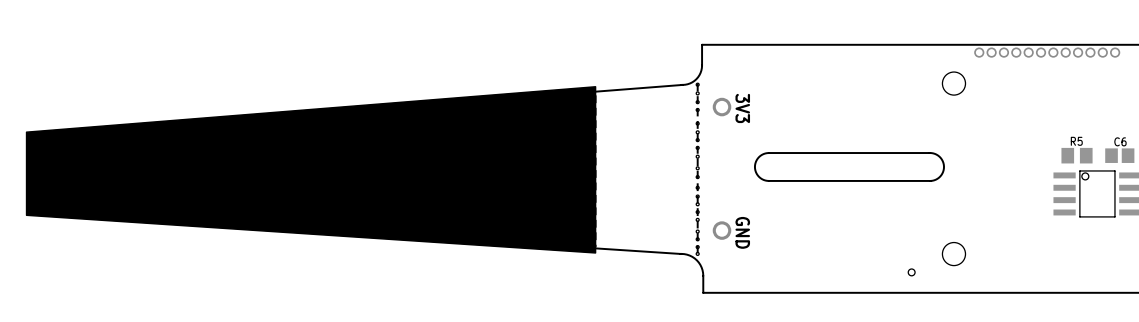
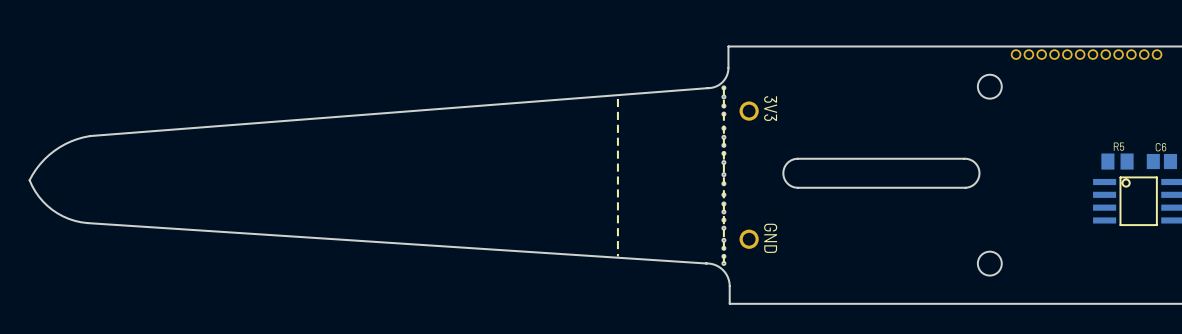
drawing: [25, 86, 597, 254] -> none
hole: (911, 272) -> none

